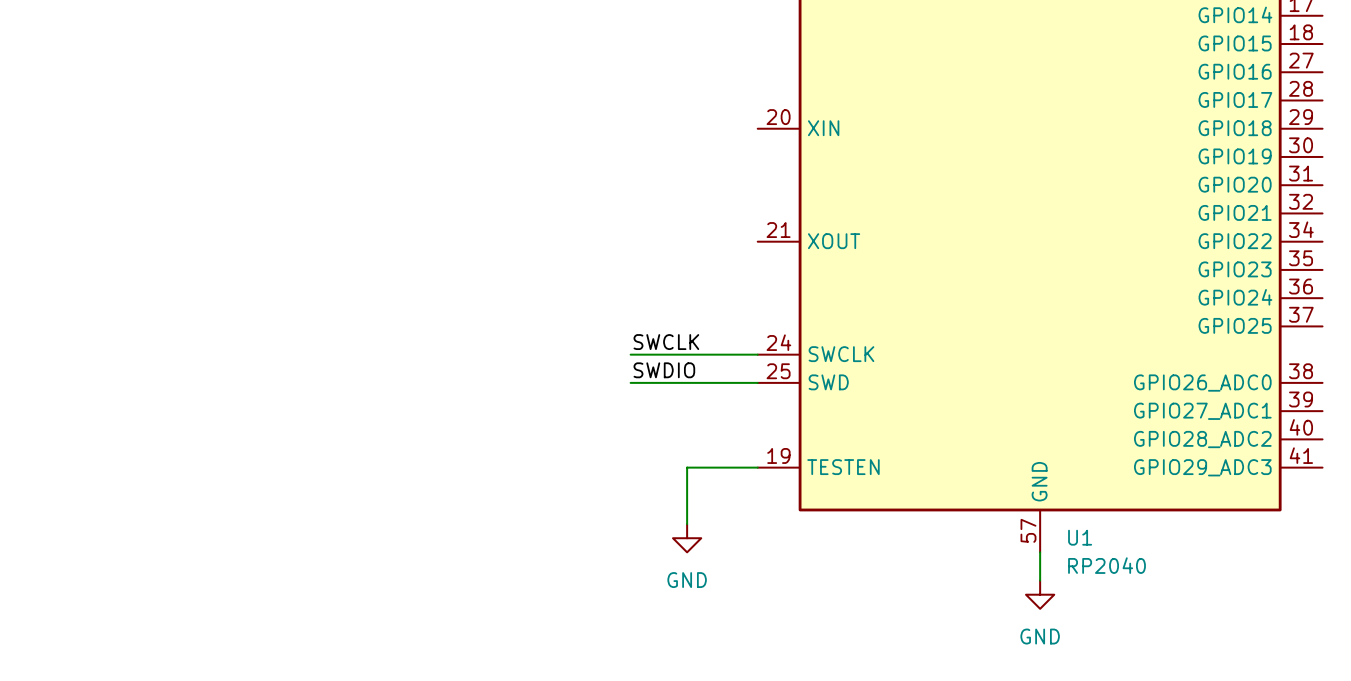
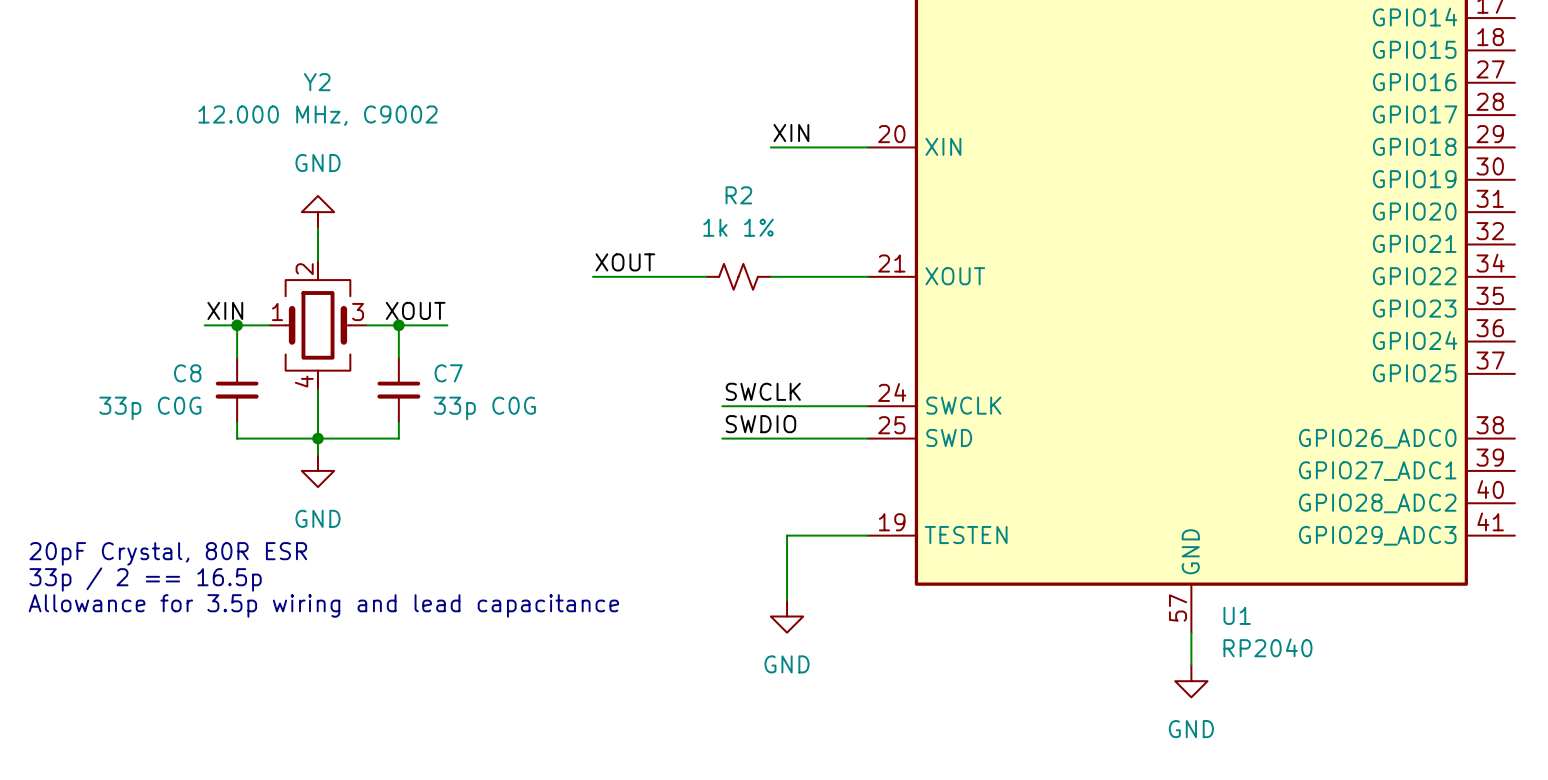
label: none -> XIN (791, 133)
wire: none -> (770, 147) (867, 147)
power symbol: none -> GND (317, 212)
wire: none -> (317, 228) (317, 260)
label: none -> XOUT (625, 262)
wire: none -> (592, 276) (706, 276)
R2: none -> 1k 1% (738, 276)
wire: none -> (770, 276) (867, 276)
label: none -> XIN (225, 310)
label: none -> XOUT (415, 310)
wire: none -> (204, 325) (269, 325)
wire: none -> (237, 325) (237, 357)
junction: none -> (237, 325)
Y2: none -> 12.000 MHz, C9002 (317, 325)
wire: none -> (366, 325) (447, 325)
wire: none -> (398, 325) (398, 357)
junction: none -> (398, 325)
C8: none -> 33p C0G (237, 390)
wire: none -> (317, 390) (317, 454)
C7: none -> 33p C0G (398, 390)
wire: none -> (237, 422) (237, 438) (398, 438) (398, 422)
junction: none -> (317, 438)
power symbol: none -> GND (317, 470)
text: none -> 20pF Crystal, 80R ESR (168, 553)
text: none -> 33p / 2 == 16.5p (145, 579)
text: none -> Allowance for 3.5p wiring and lead capacitance (323, 605)

